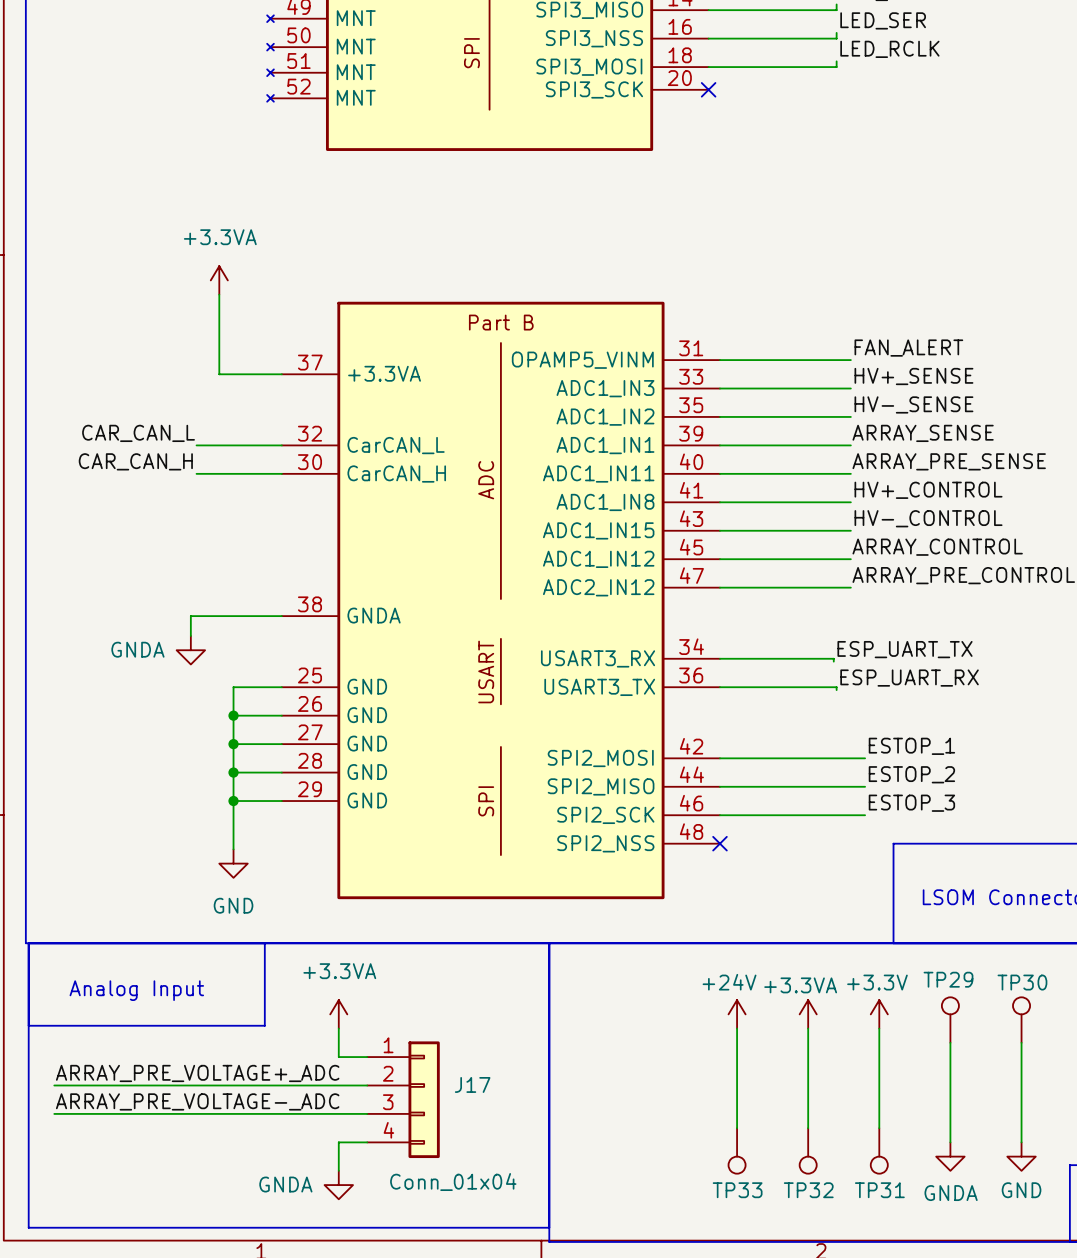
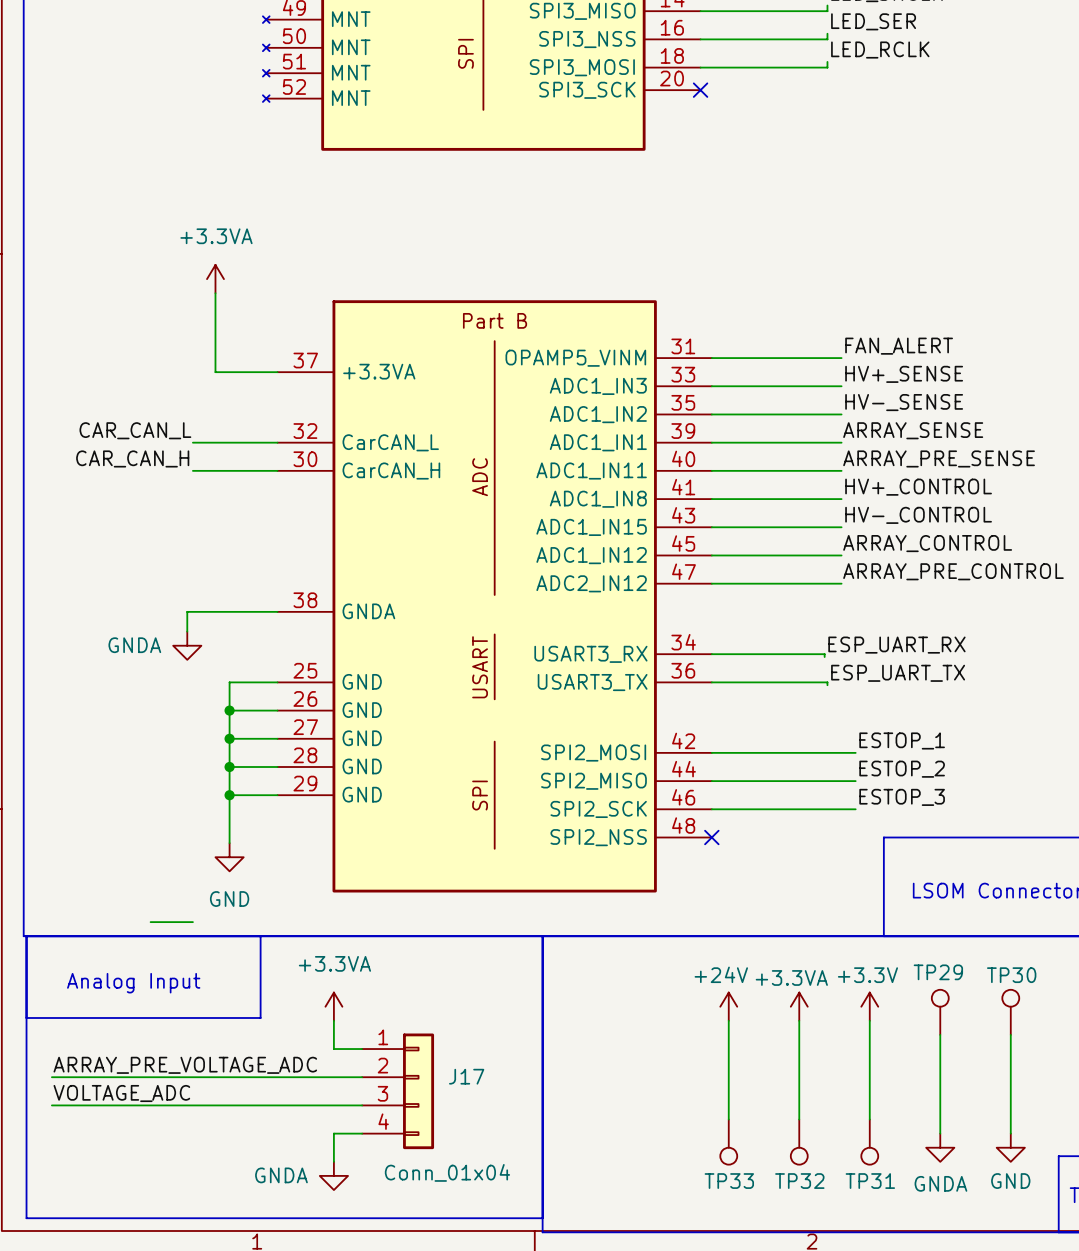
label: ESP_UART_TX (905, 649) -> ESP_UART_RX (896, 645)
label: ESP_UART_RX (909, 678) -> ESP_UART_TX (898, 673)
wire: none -> (150, 922) (192, 922)
label: ARRAY_PRE_VOLTAGE+_ADC (197, 1073) -> ARRAY_PRE_VOLTAGE_ADC (185, 1065)
label: ARRAY_PRE_VOLTAGE-_ADC (197, 1101) -> VOLTAGE_ADC (121, 1093)

